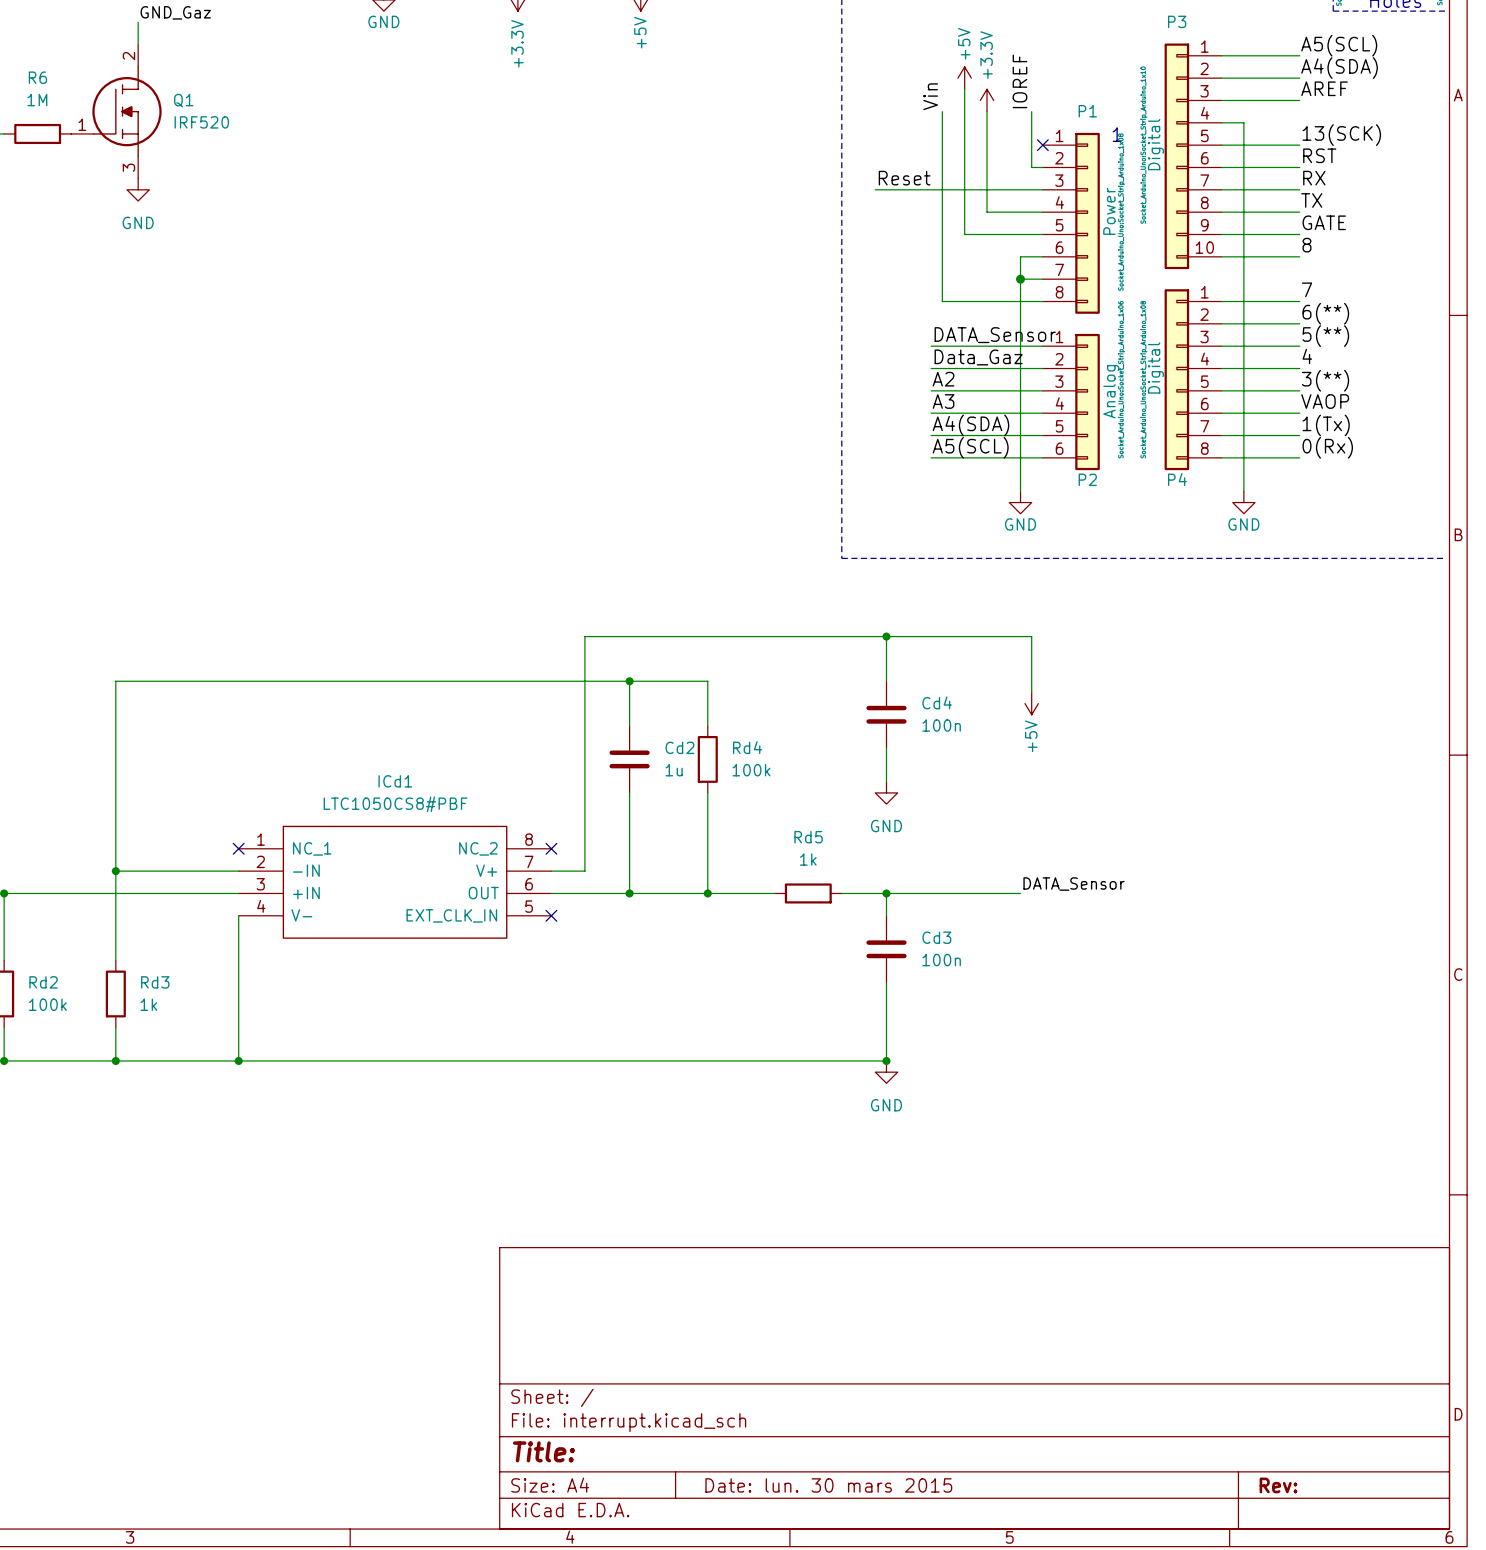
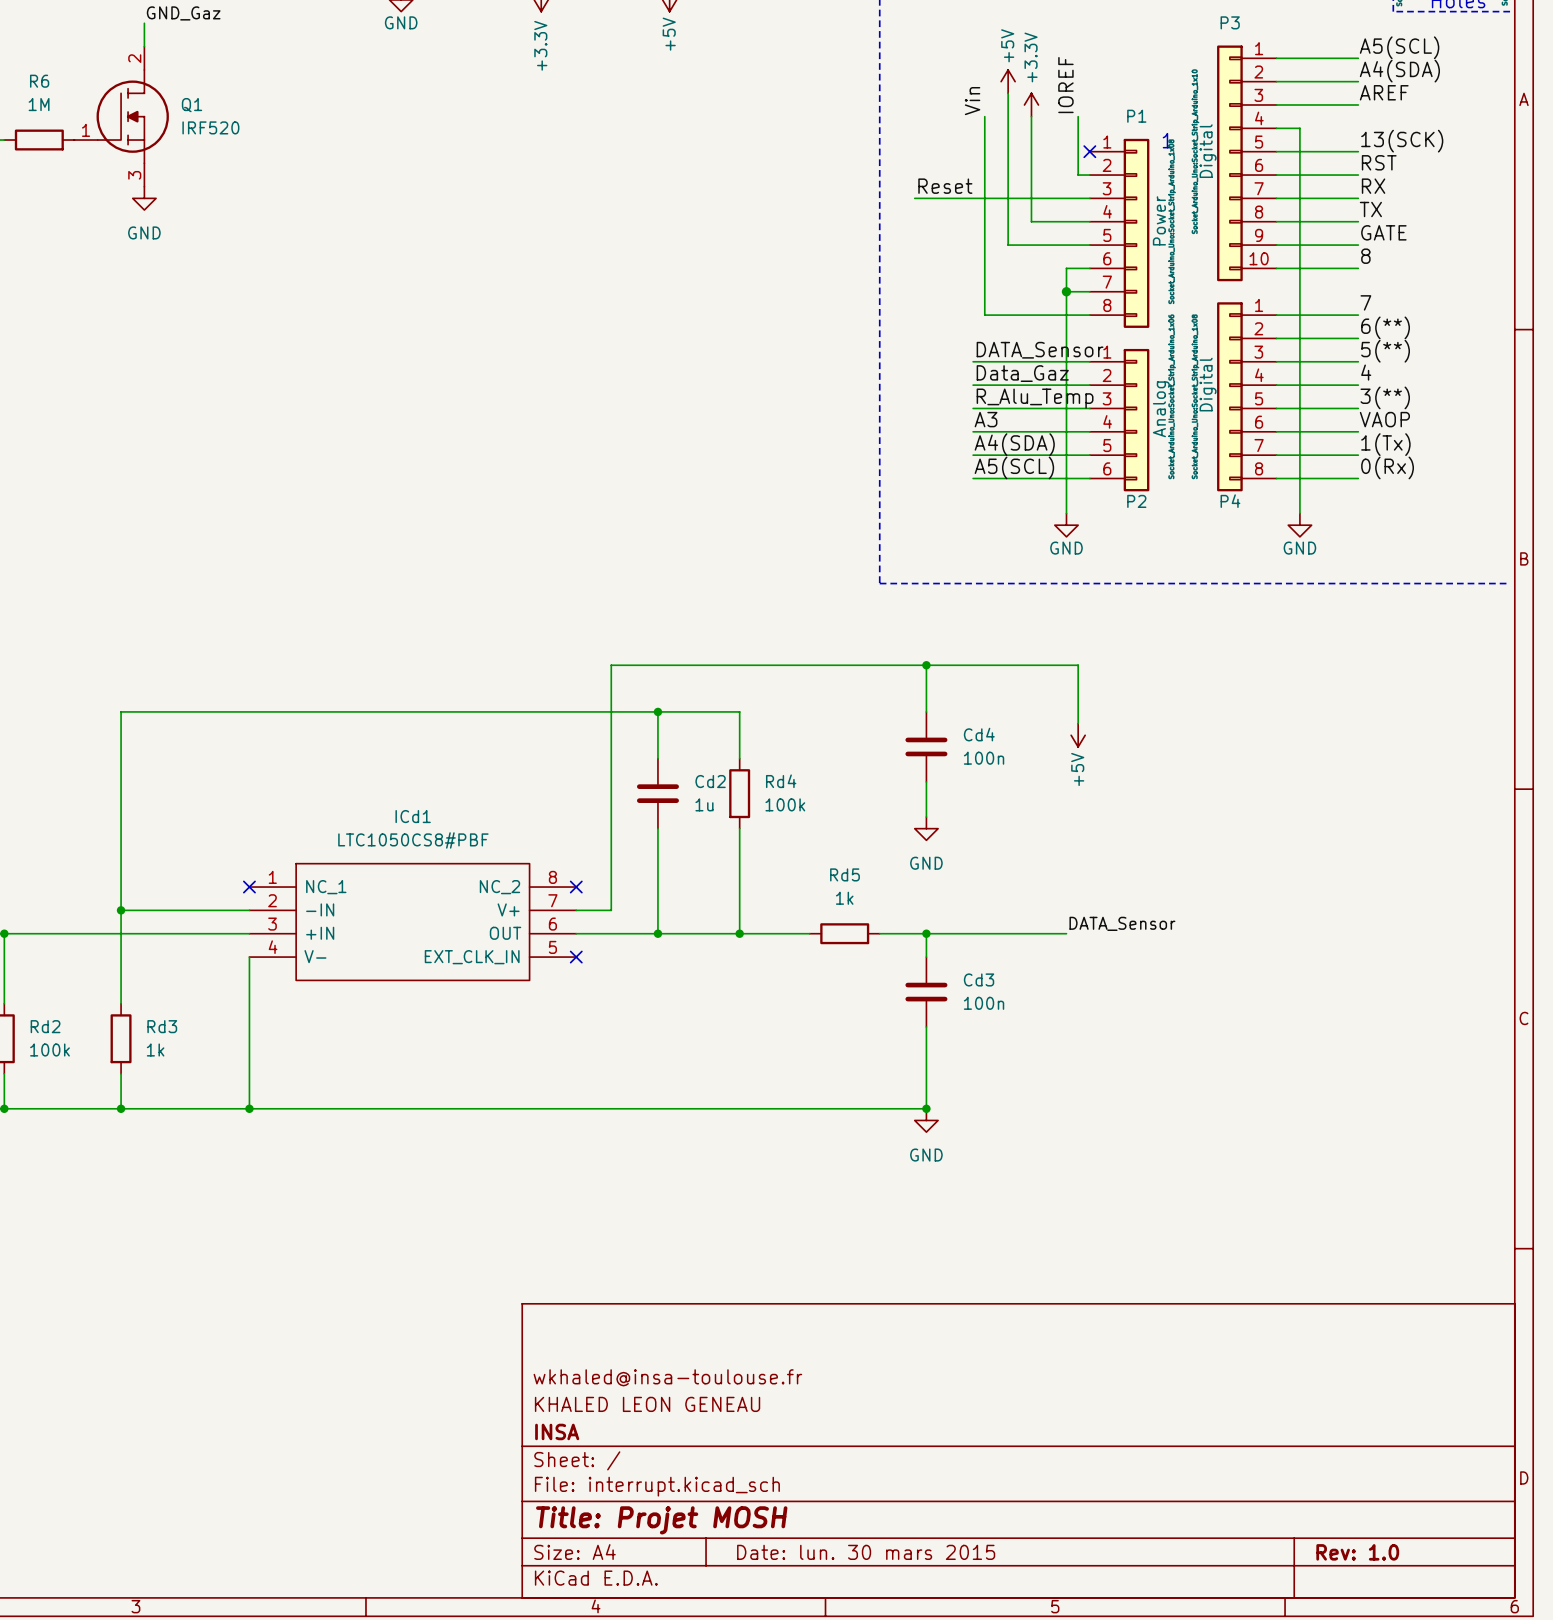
label: A2 (943, 379) -> R_Alu_Temp (1035, 398)
title block: none -> wkhaled@insa-toulouse.fr (667, 1377)
title block: none -> KHALED LEON GENEAU (647, 1404)
title block: none -> INSA (557, 1431)
title block: Title: (543, 1451) -> Title: Projet MOSH (661, 1520)
title block: Rev: (1278, 1485) -> Rev: 1.0 (1357, 1552)

